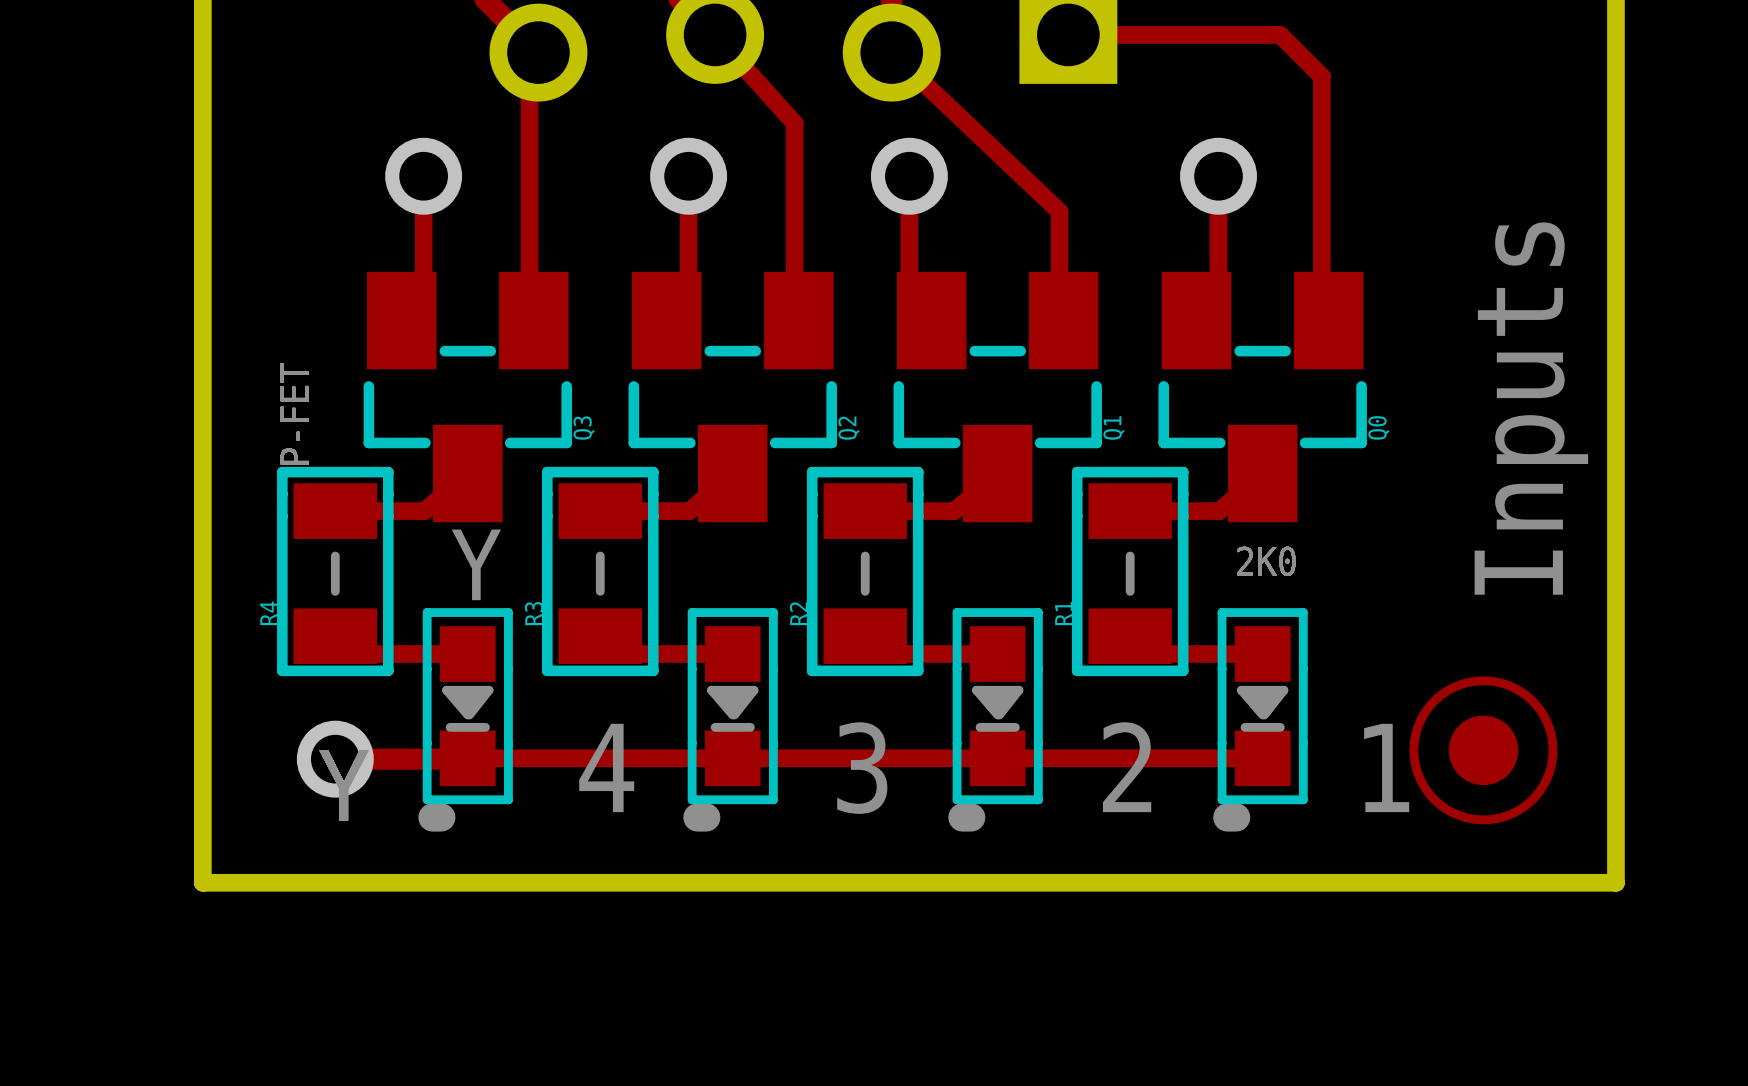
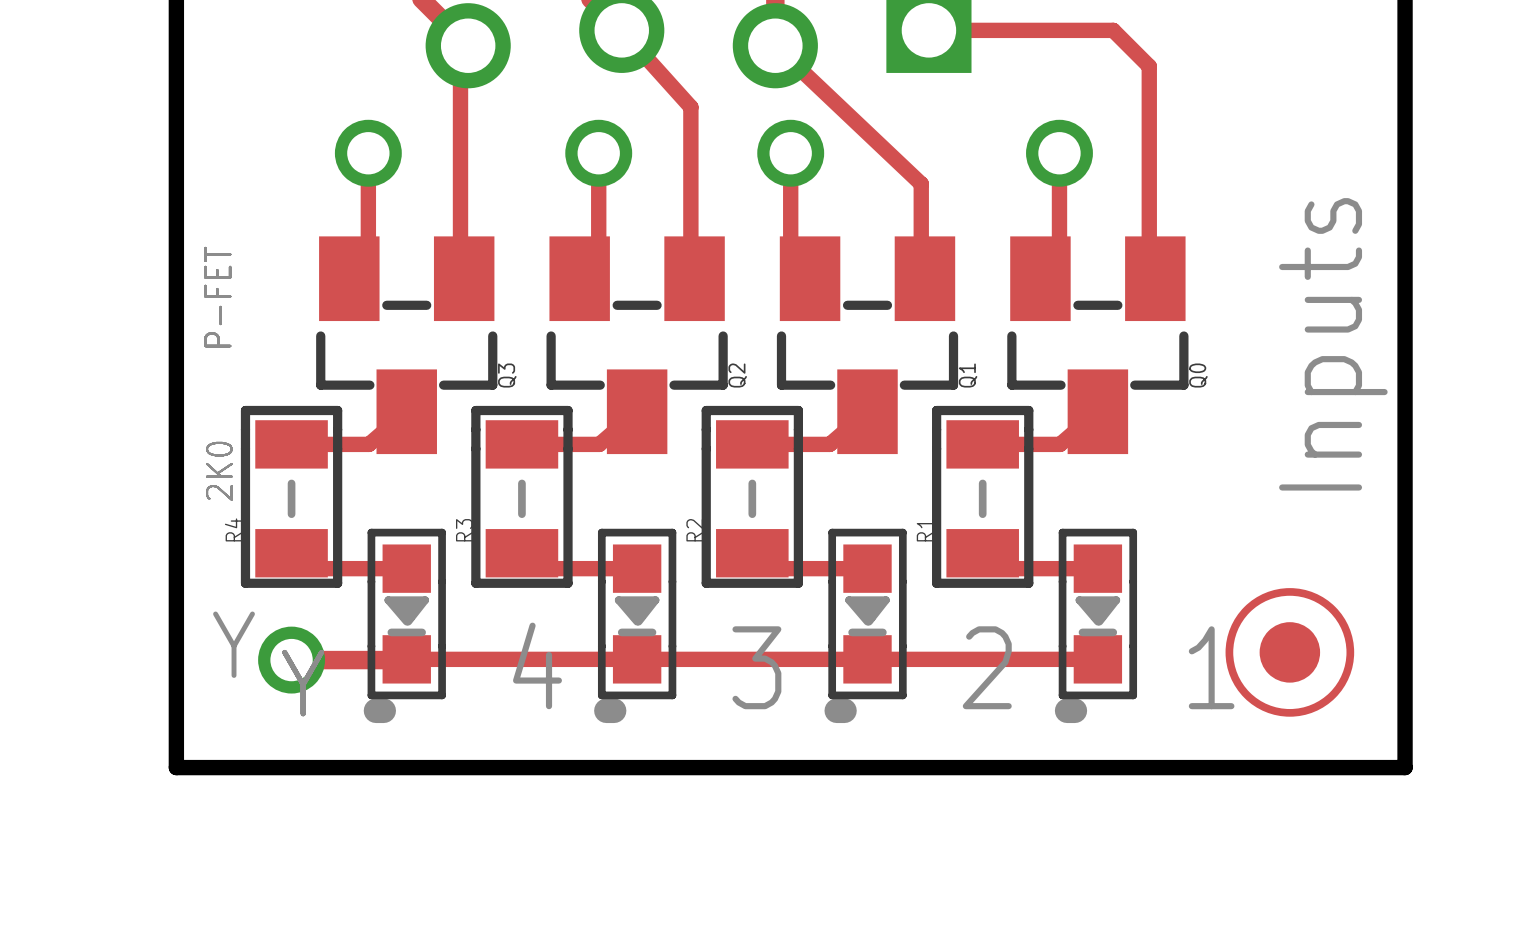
Q0 value position: P-FET (294, 413) -> P-FET (217, 297)
Q1 value position: P-FET (294, 413) -> P-FET (217, 297)
Q2 value position: P-FET (294, 413) -> P-FET (217, 297)
Q3 value position: P-FET (294, 413) -> P-FET (217, 297)
R1 value rotation: 0° (1266, 561) -> 90° counterclockwise (219, 471)
R1 value position: 2K0 (1266, 561) -> 2K0 (219, 471)
R2 value rotation: 0° (1266, 561) -> 90° counterclockwise (219, 471)
R2 value position: 2K0 (1266, 561) -> 2K0 (219, 471)
R3 value rotation: 0° (1266, 561) -> 90° counterclockwise (219, 471)
R3 value position: 2K0 (1266, 561) -> 2K0 (219, 471)
R4 value rotation: 0° (1266, 561) -> 90° counterclockwise (219, 471)
R4 value position: 2K0 (1266, 561) -> 2K0 (219, 471)
part value position: Y (476, 564) -> Y (234, 644)

